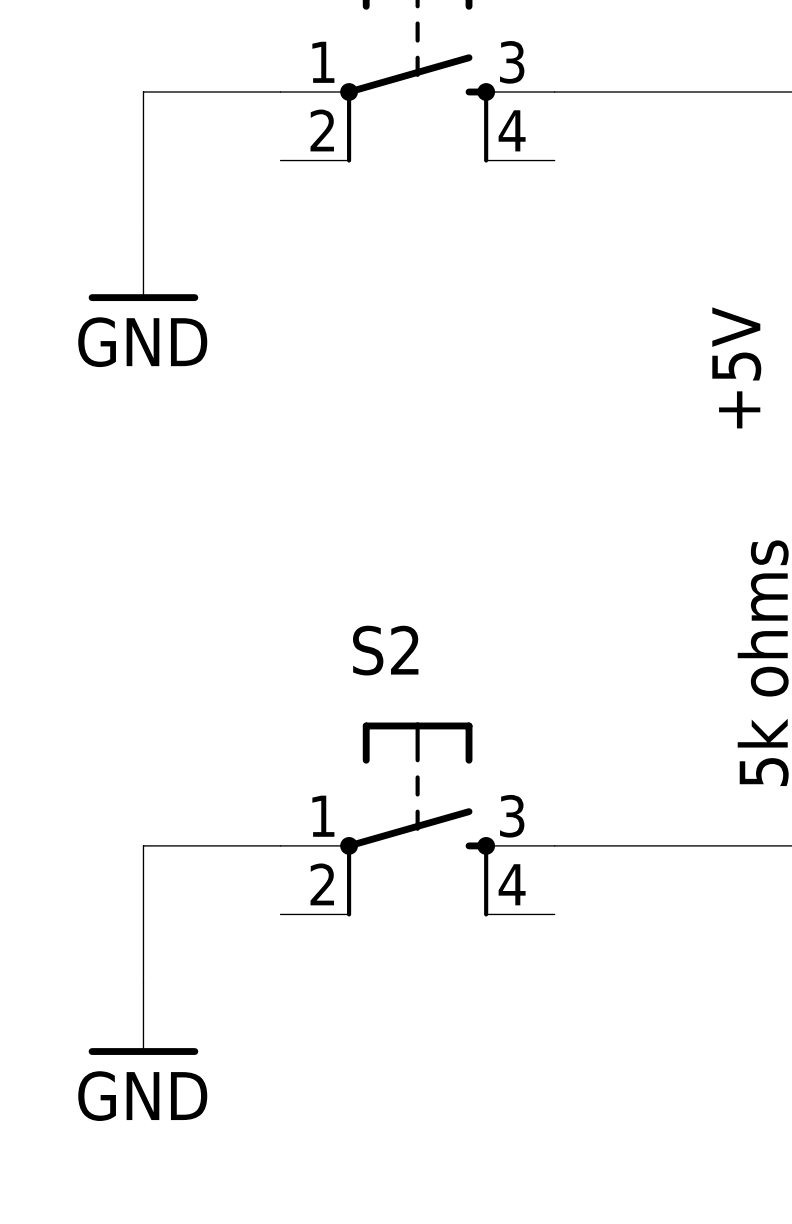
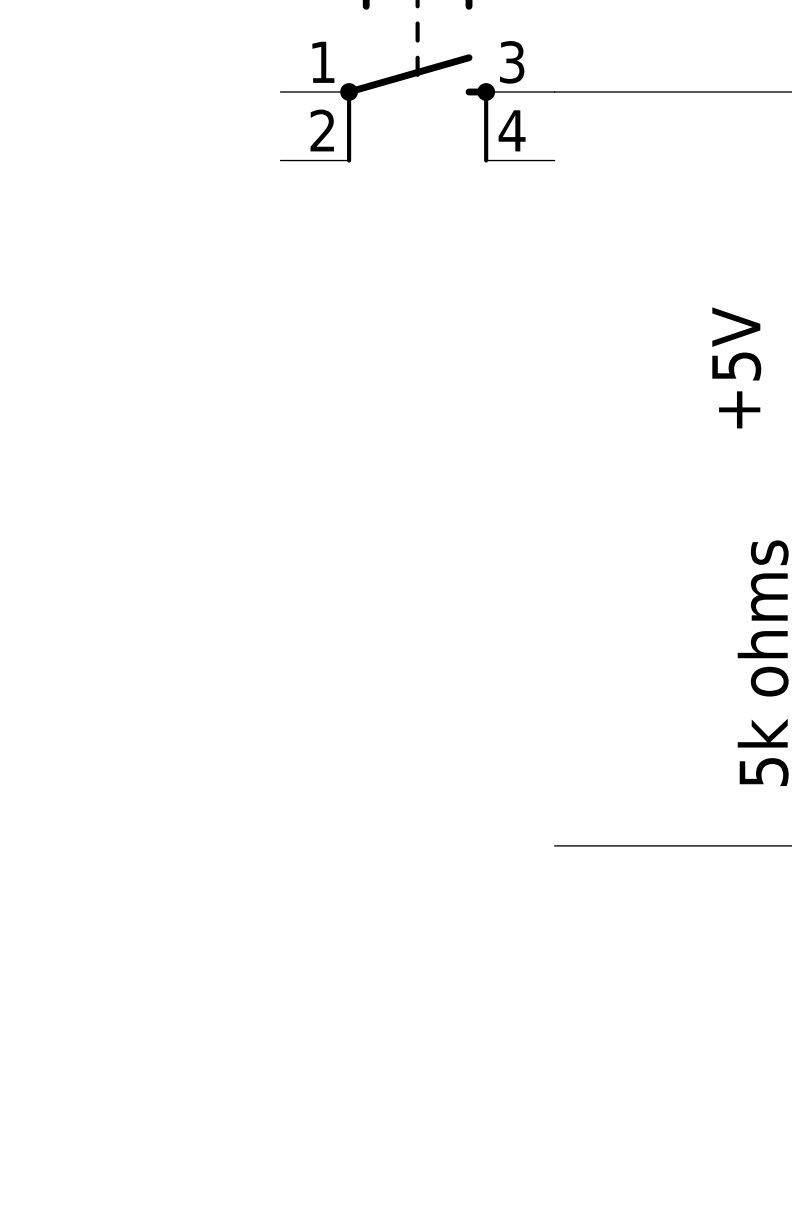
wire: (280, 92) (143, 92) (143, 229) -> none
power symbol: GND (143, 265) -> none
S2: (417, 819) -> none
wire: (280, 845) (143, 845) (143, 982) -> none
power symbol: GND (143, 1018) -> none

